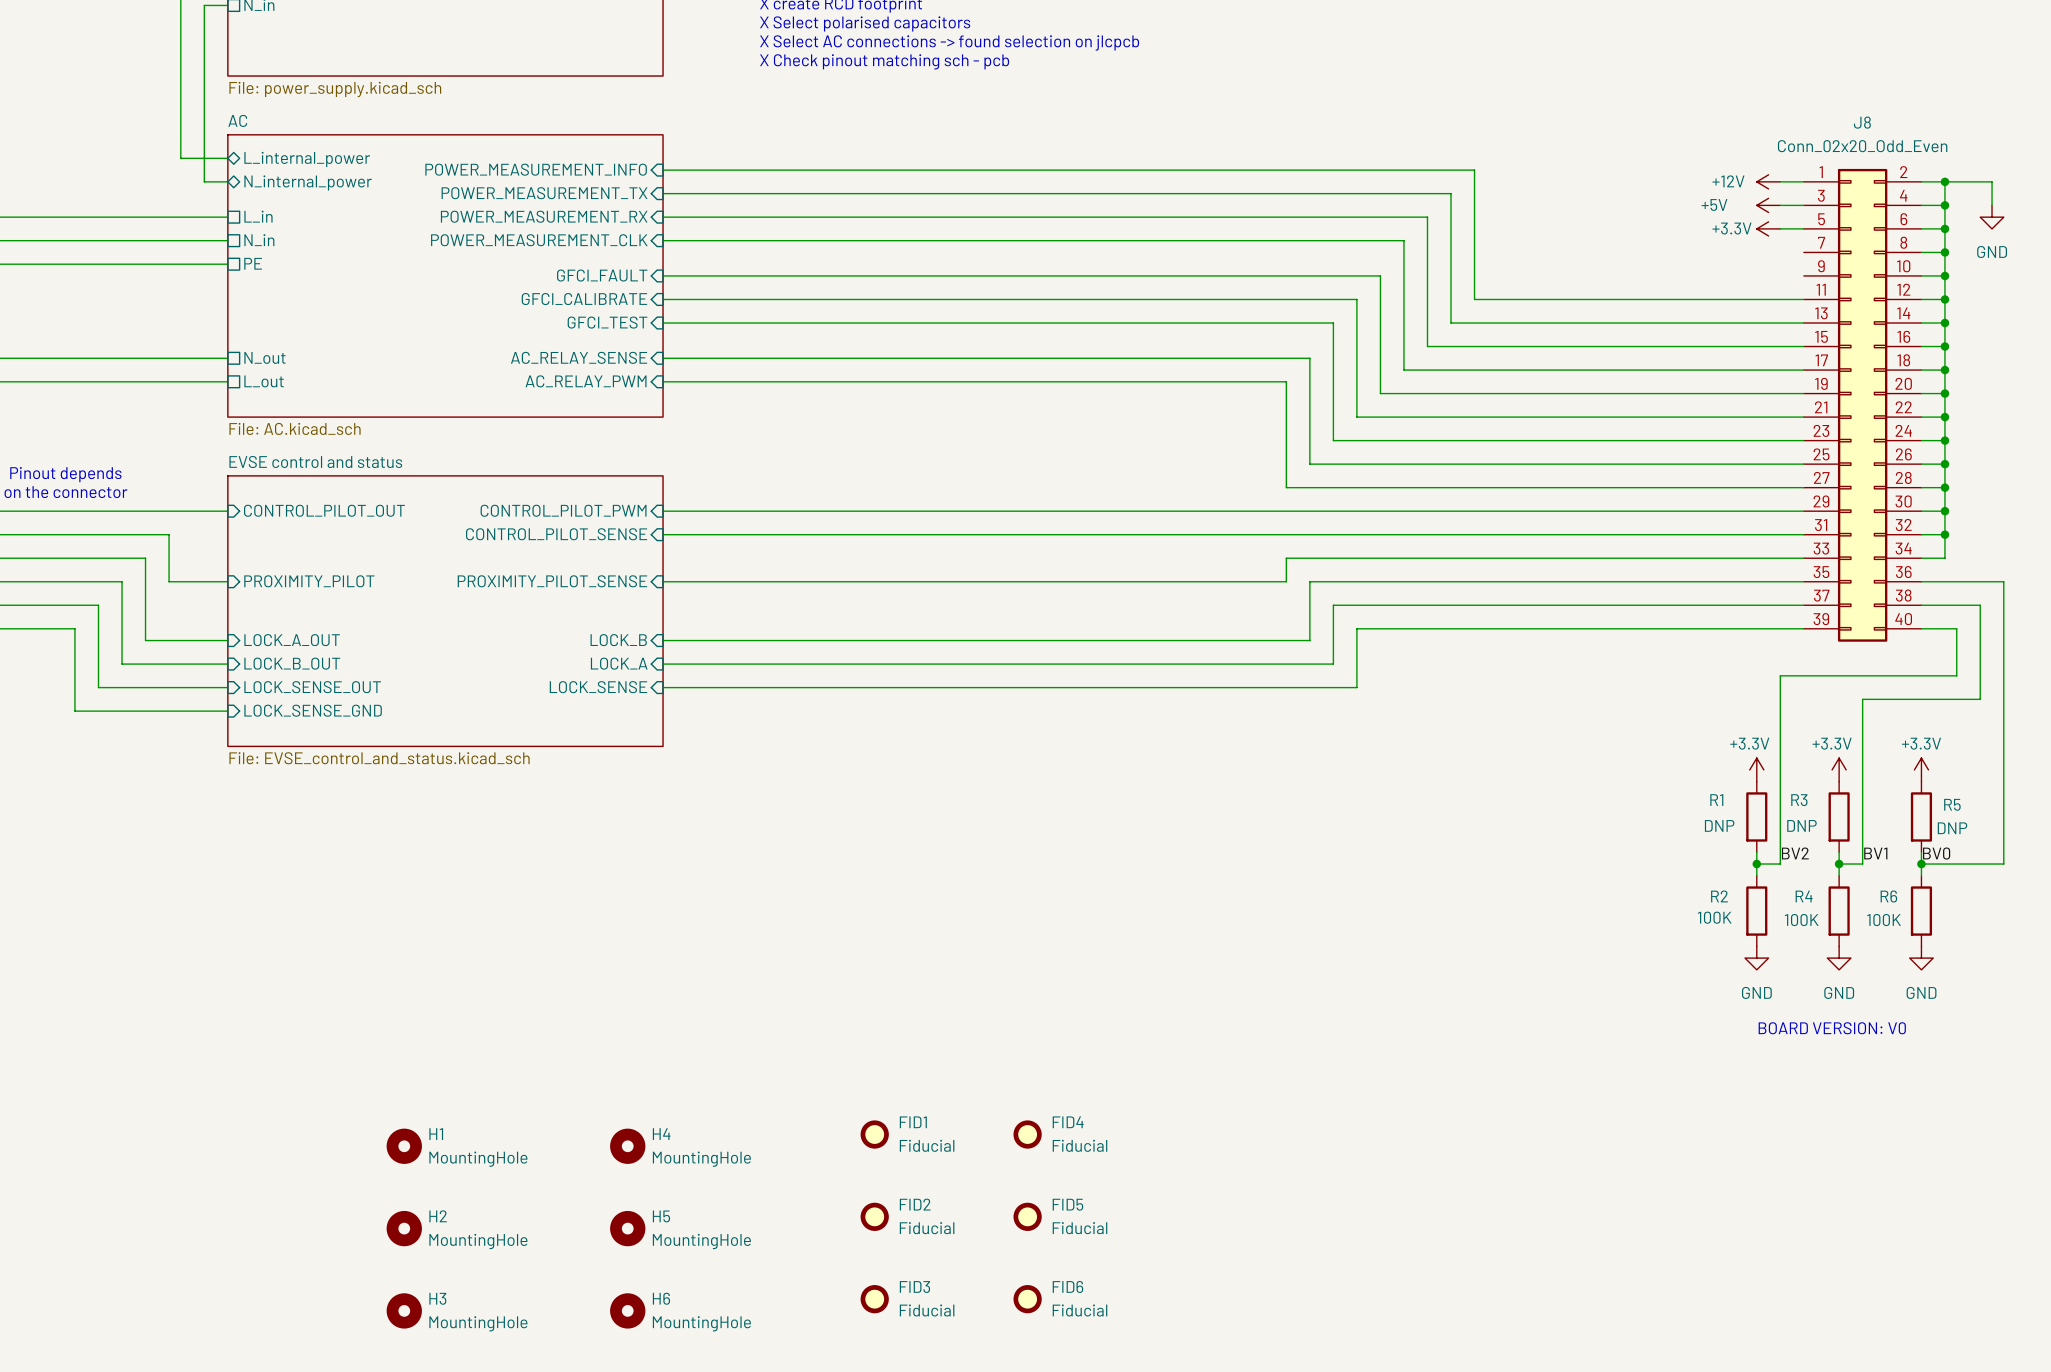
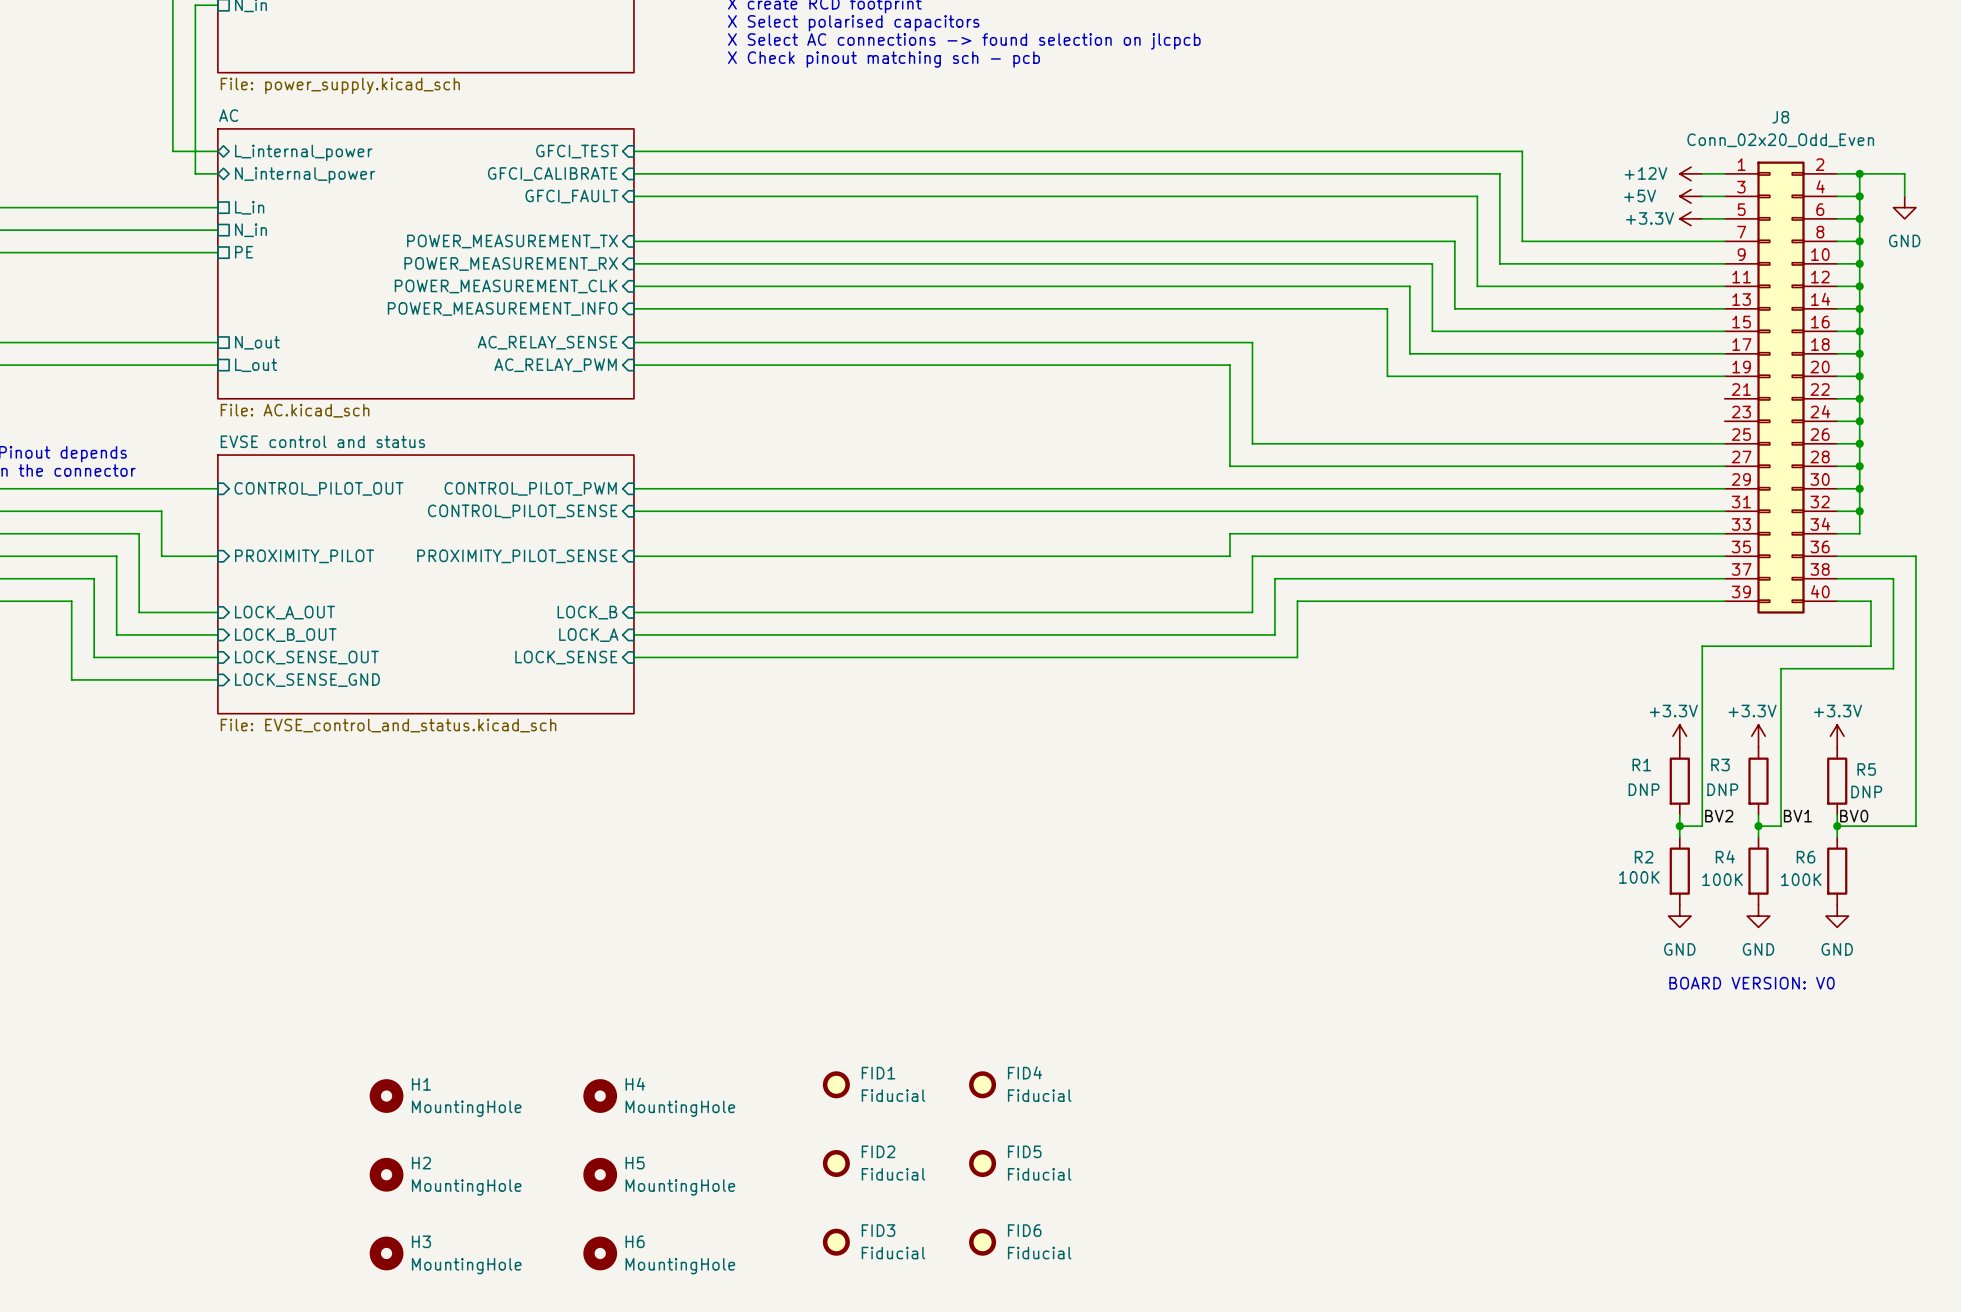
sheet pin: none -> GFCI_TEST (577, 151)
wire: none -> (633, 151) (1522, 151) (1522, 241) (1724, 241)
sheet pin: POWER_MEASUREMENT_INFO (536, 169) -> none
wire: (663, 170) (1474, 170) (1474, 299) (1545, 299) -> (633, 196) (1477, 196) (1477, 286)
sheet pin: none -> GFCI_CALIBRATE (552, 174)
wire: none -> (633, 173) (1499, 173) (1499, 263) (1724, 263)
sheet pin position: POWER_MEASUREMENT_TX (544, 193) -> POWER_MEASUREMENT_TX (512, 241)
wire: (663, 193) (1451, 193) (1451, 323) (1521, 323) -> (633, 241) (1454, 241) (1454, 308)
sheet pin: none -> GFCI_FAULT (571, 196)
sheet pin: POWER_MEASUREMENT_RX (544, 216) -> none
wire: (663, 217) (1427, 217) (1427, 346) (1498, 346) -> (1319, 263) (1432, 263) (1432, 331)
sheet pin: POWER_MEASUREMENT_CLK (539, 240) -> none
wire: (663, 240) (1403, 240) (1403, 370) (1474, 370) -> none
sheet pin: GFCI_FAULT (602, 275) -> POWER_MEASUREMENT_RX (511, 263)
wire: (1380, 275) (1380, 393) (1451, 393) -> (1274, 308) (1387, 308) (1387, 376)
sheet pin: GFCI_CALIBRATE (584, 299) -> POWER_MEASUREMENT_CLK (506, 286)
wire: (1356, 299) (1356, 417) (1803, 417) -> (1297, 286) (1409, 286) (1409, 353)
sheet pin: GFCI_TEST (607, 322) -> POWER_MEASUREMENT_INFO (502, 308)
wire: (1333, 323) (1333, 440) (1803, 440) -> none

